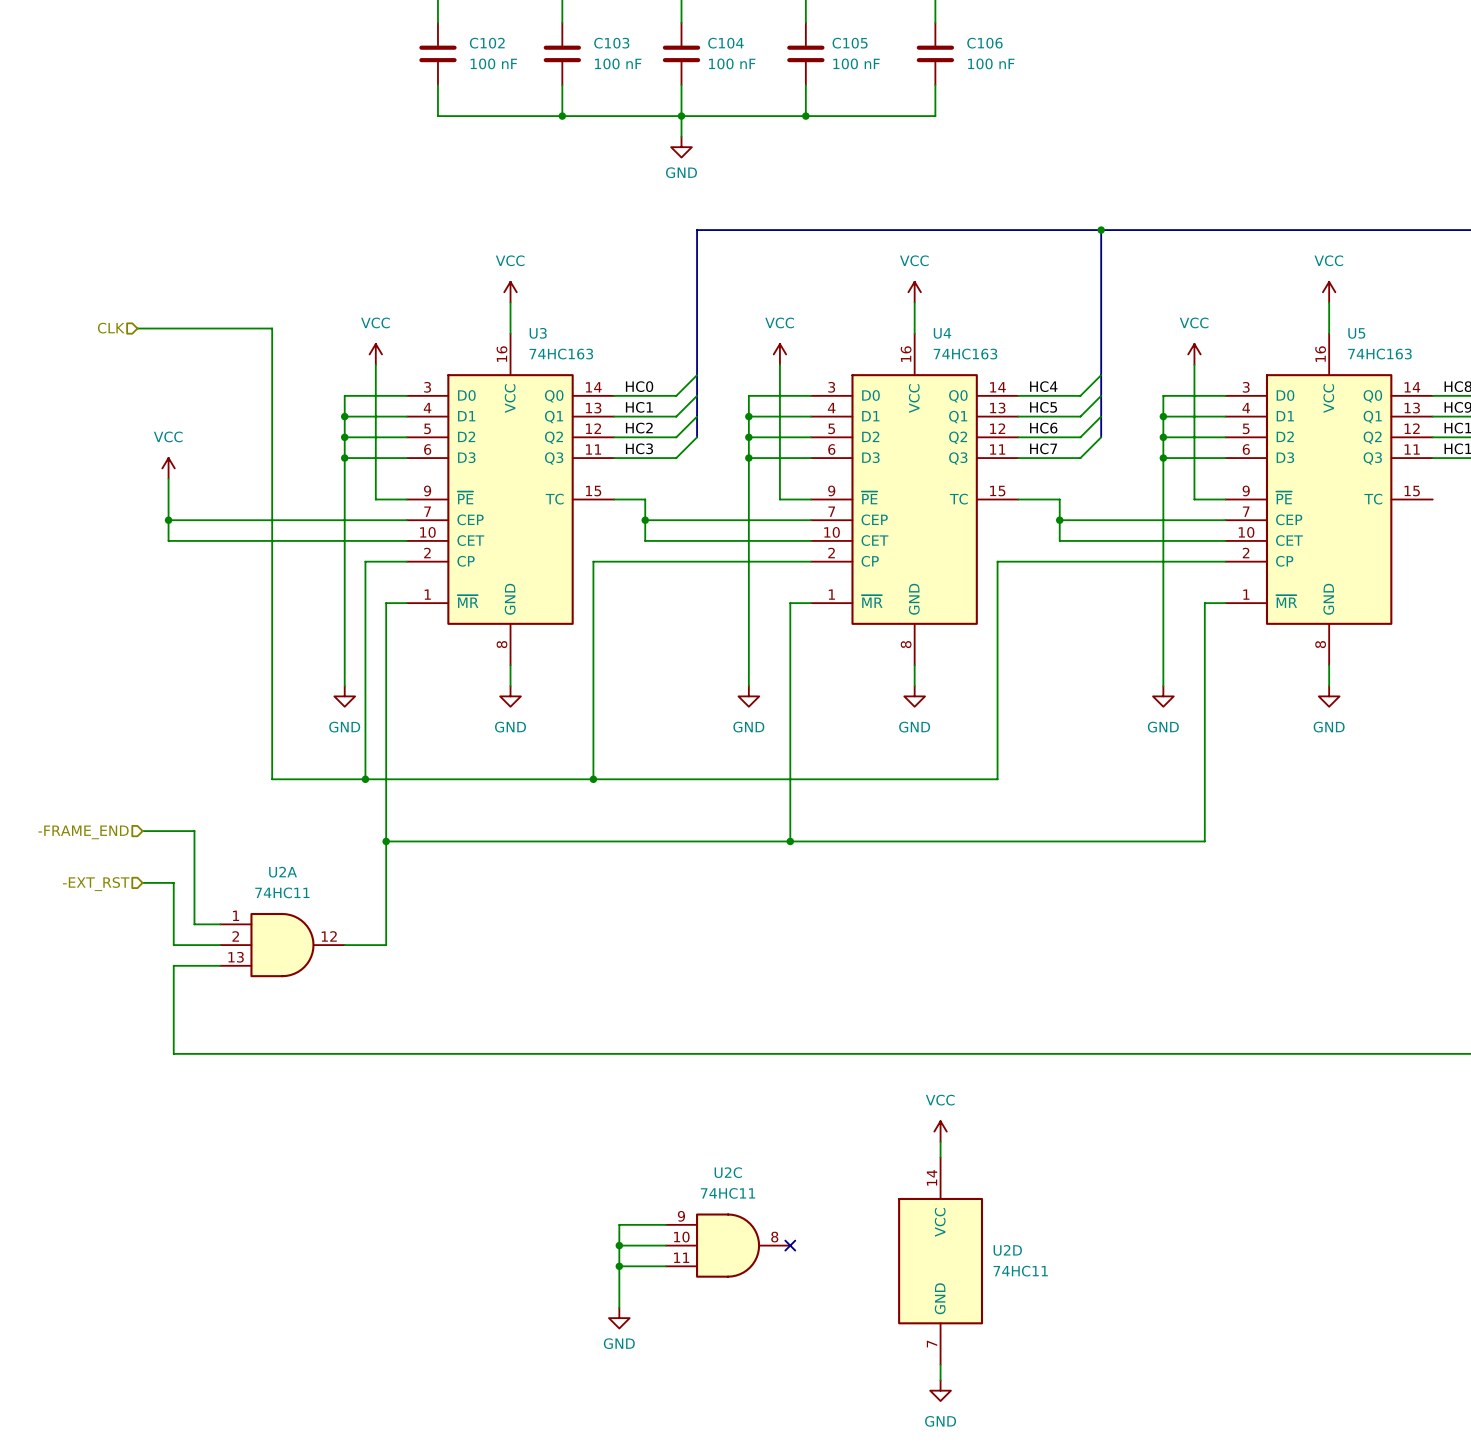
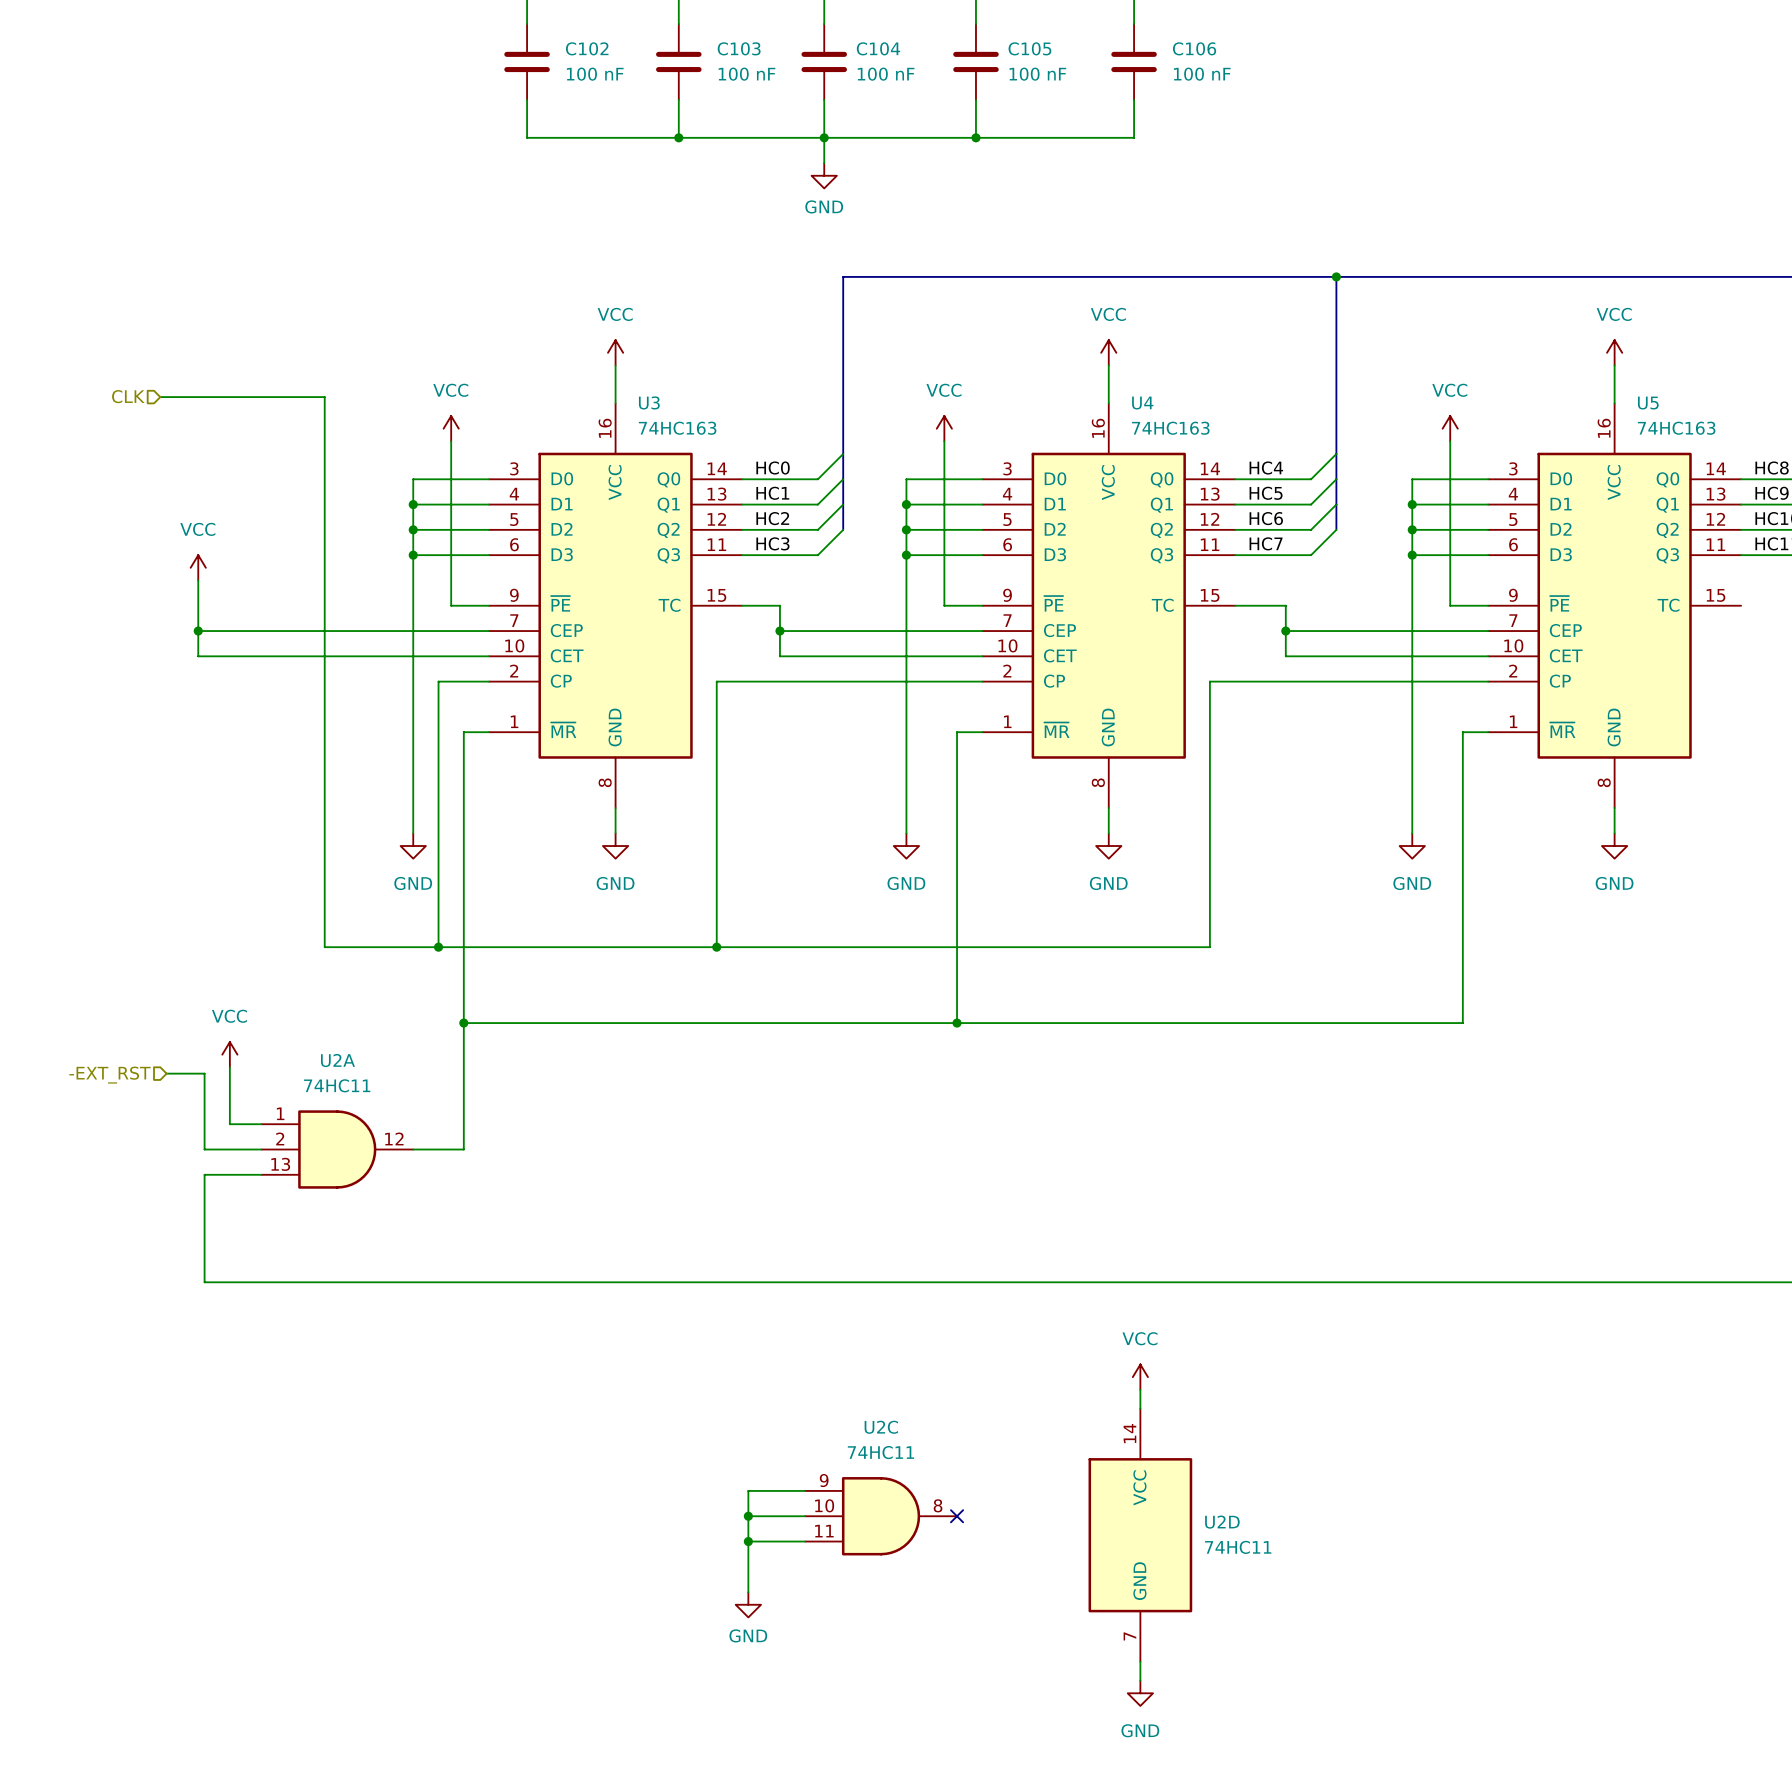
wire: (142, 831) (194, 831) (194, 877) -> none
hierarchical label: -FRAME_END (83, 832) -> none
power symbol: none -> VCC (229, 1054)

